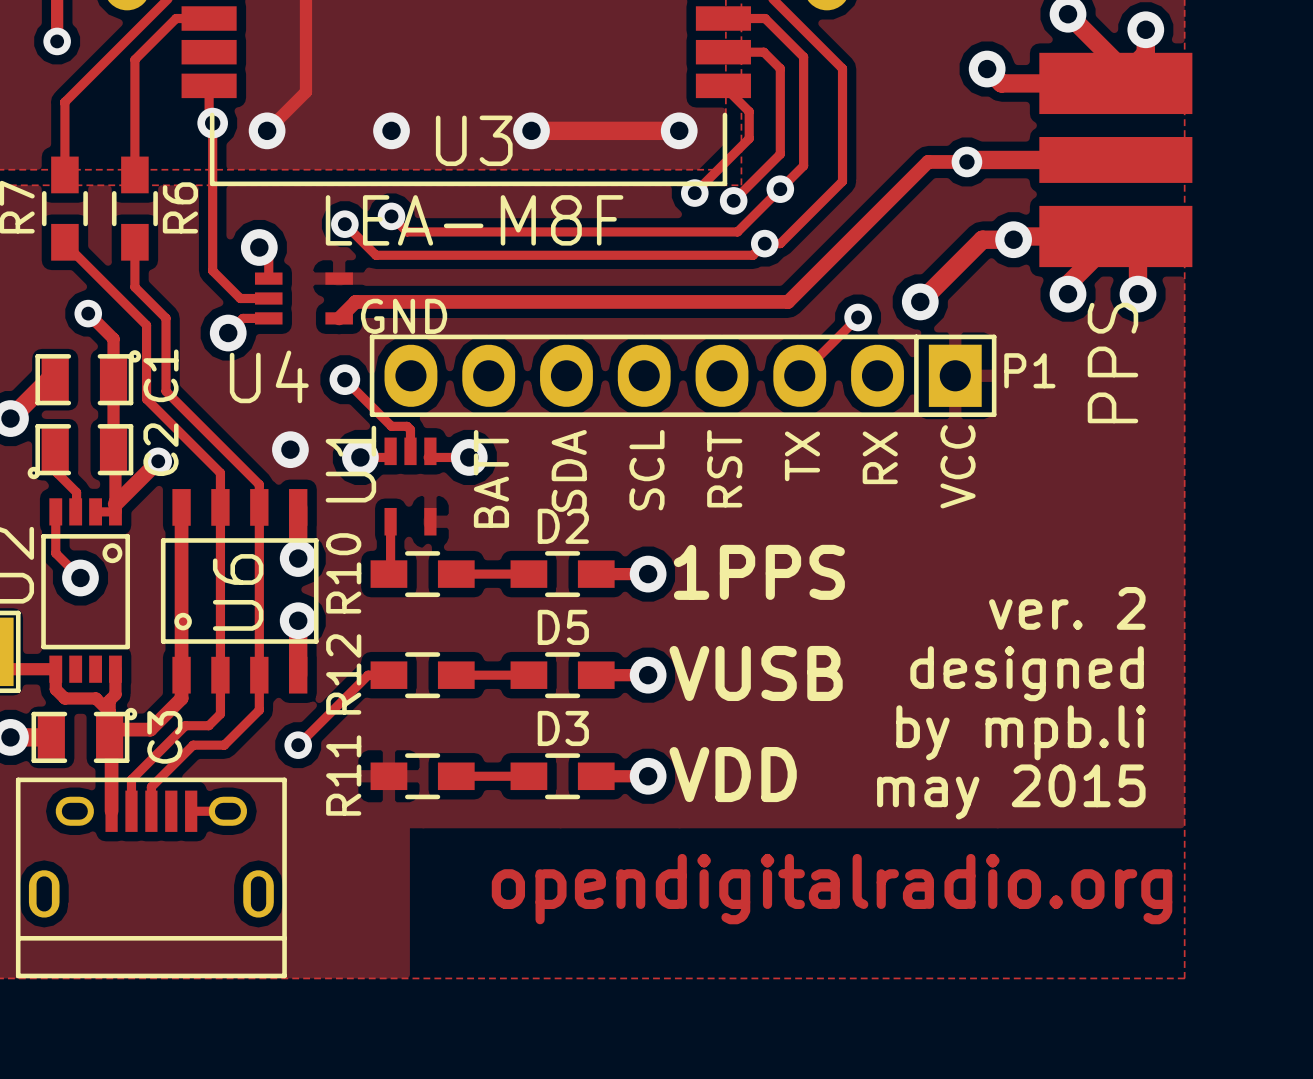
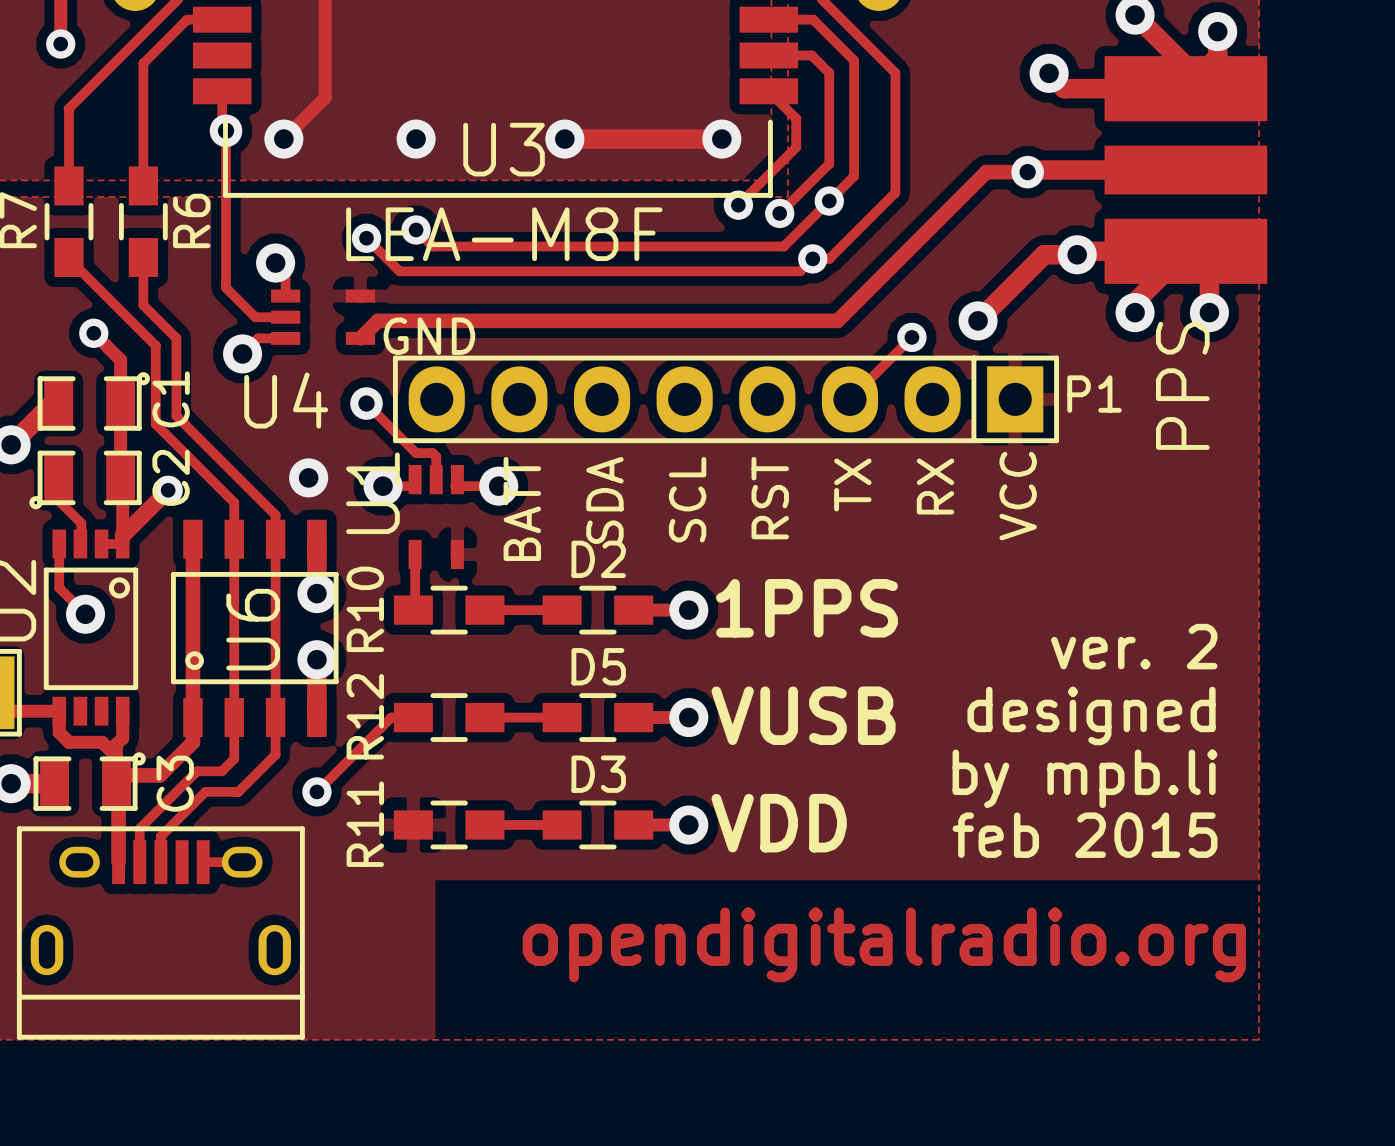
text: may 2015 (1011, 791) -> feb 2015 (1085, 835)

